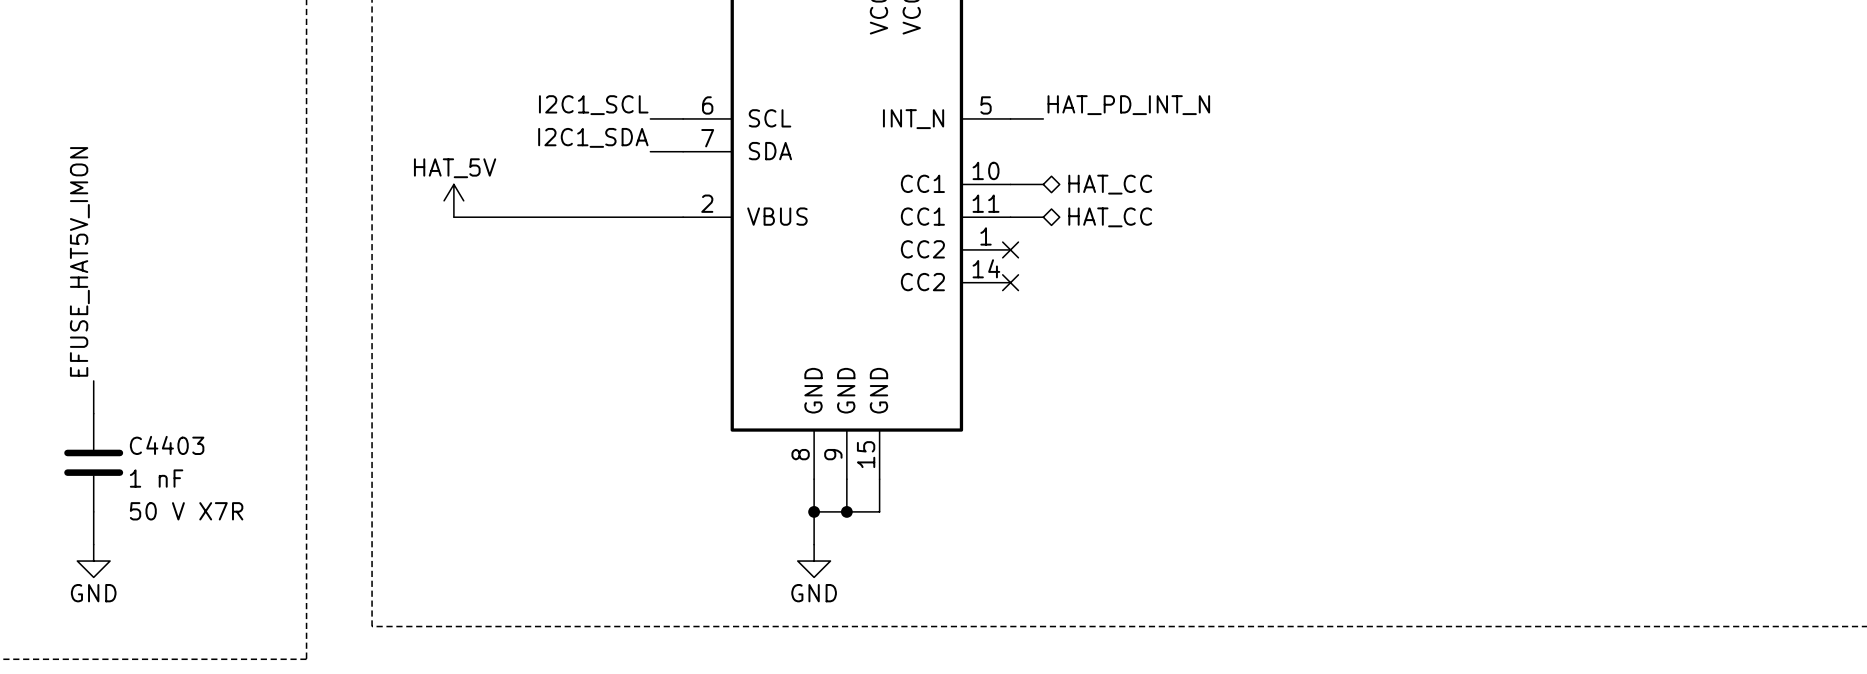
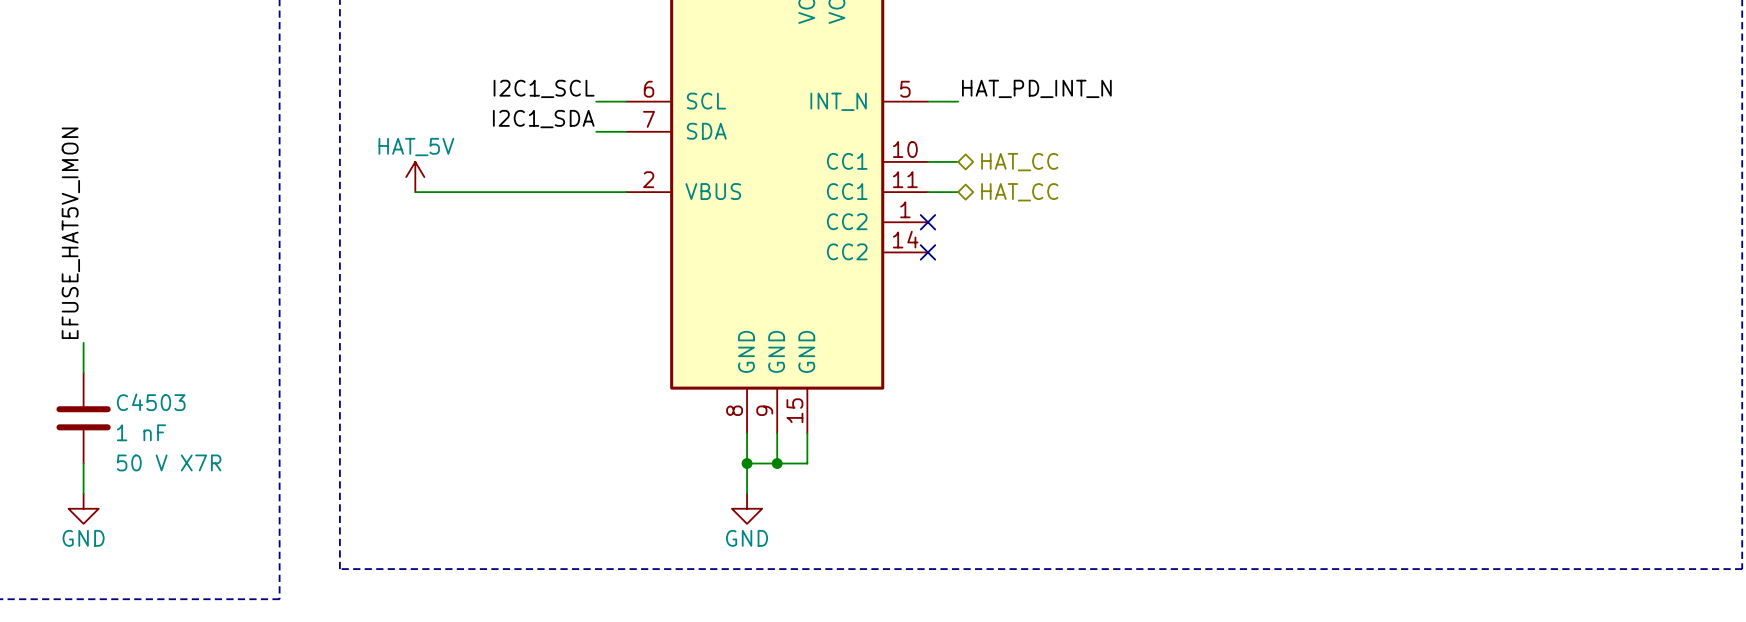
C4403 name: C4403 (167, 445) -> C4503 (151, 402)

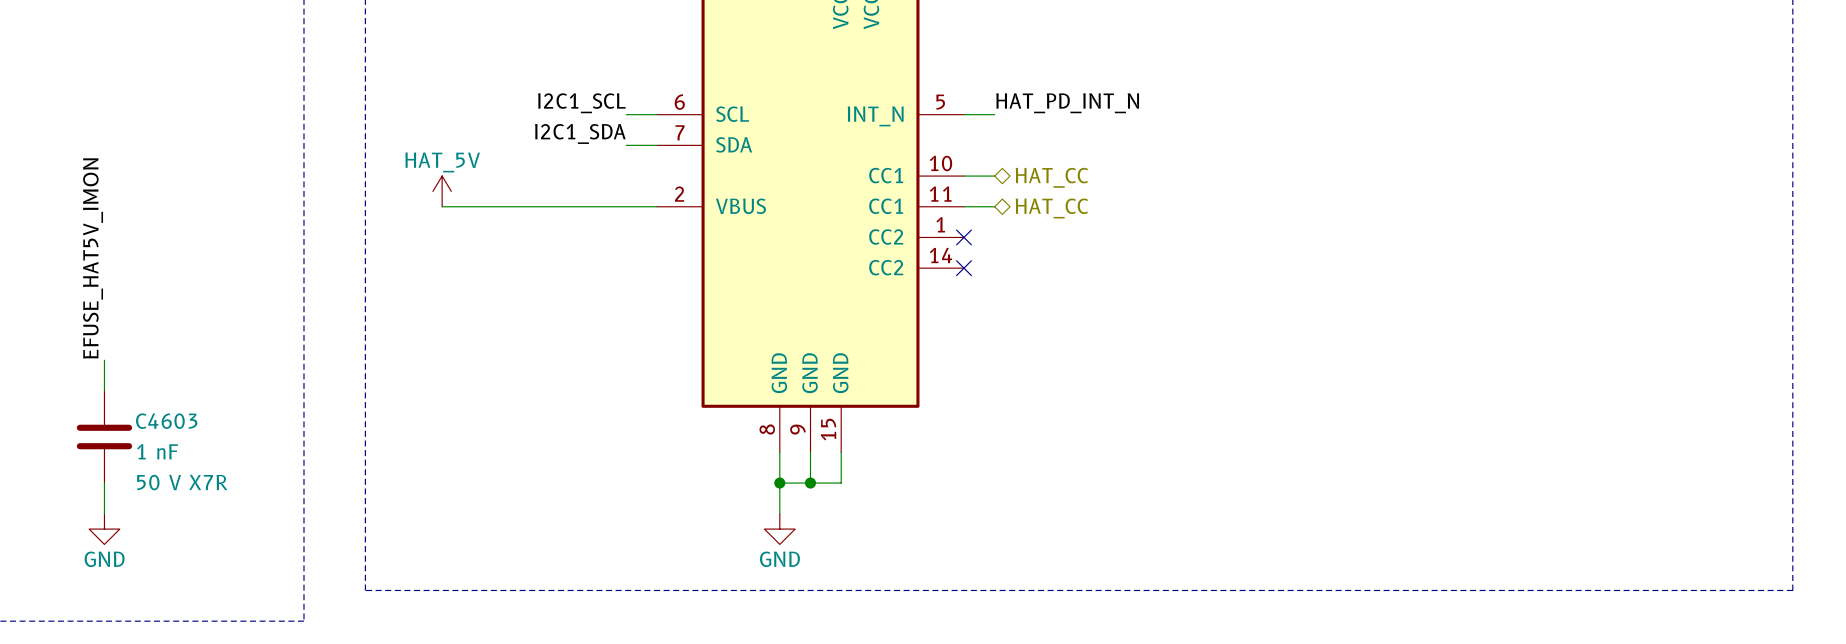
C4503 name: C4503 (151, 402) -> C4603 (166, 421)

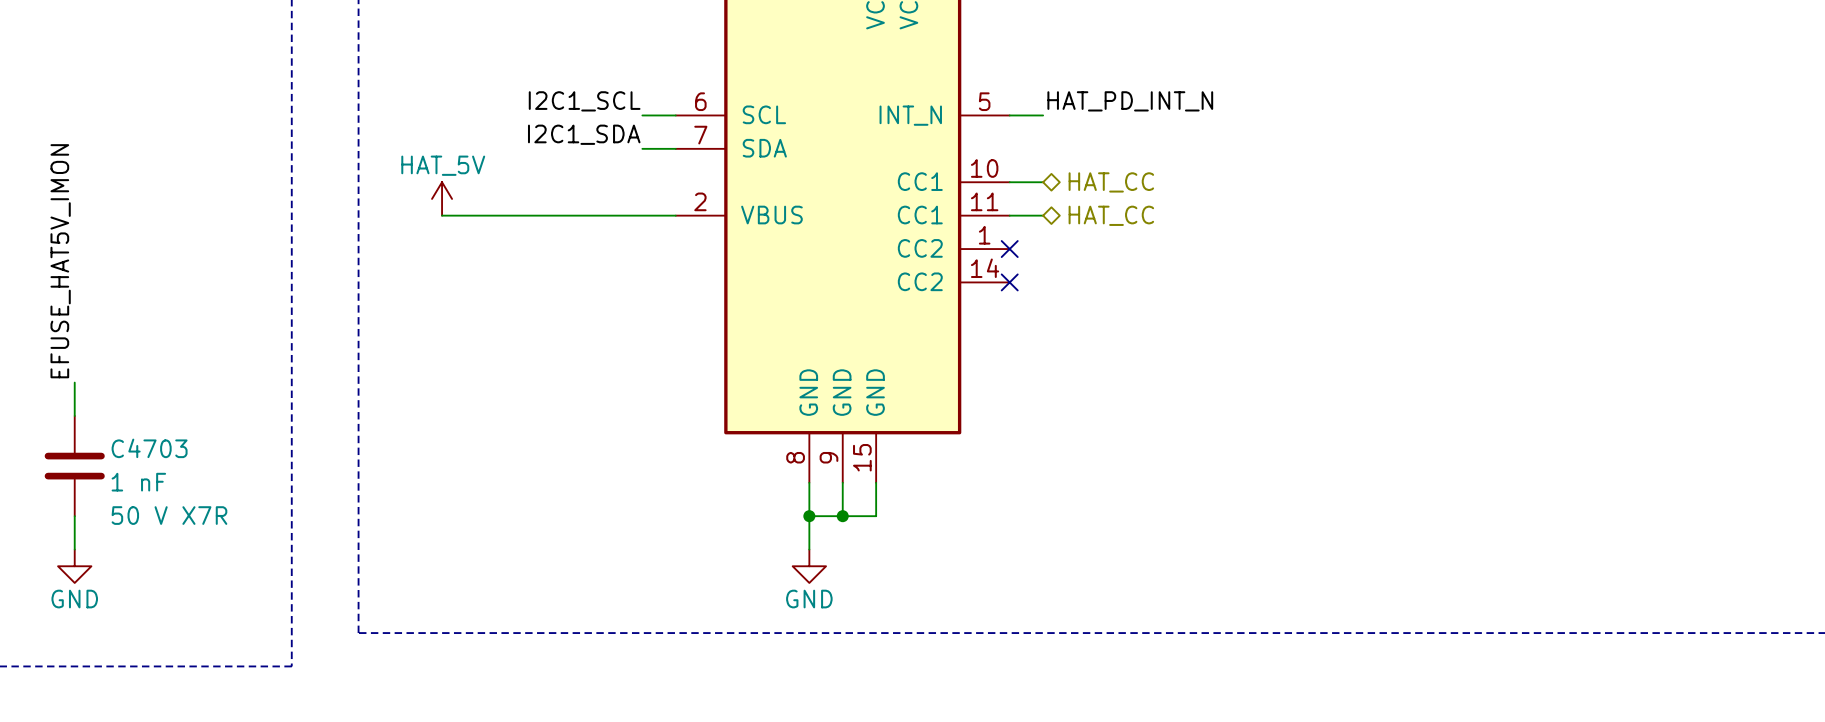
C4603 name: C4603 (166, 421) -> C4703 (149, 448)

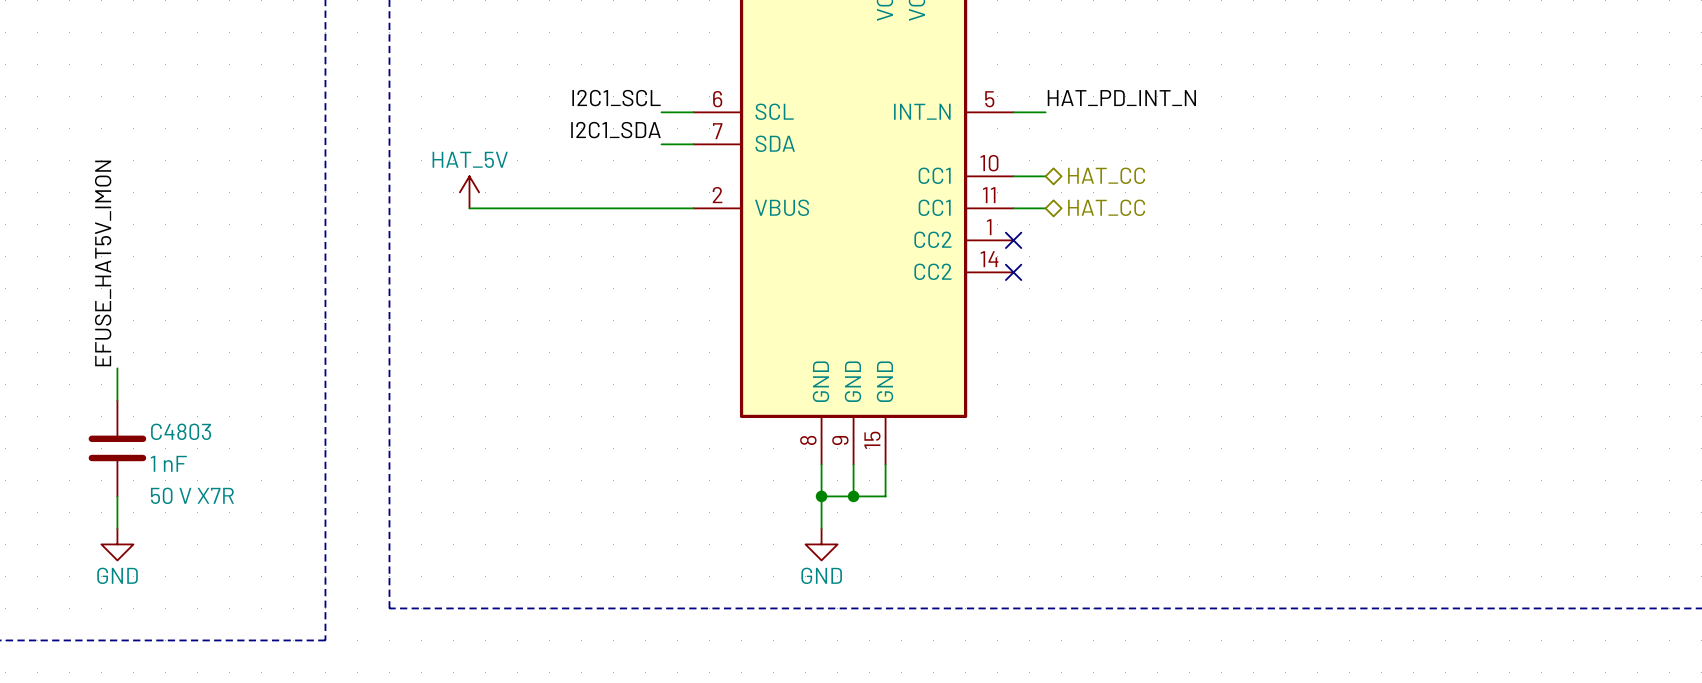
C4703 name: C4703 (149, 448) -> C4803 (181, 431)

